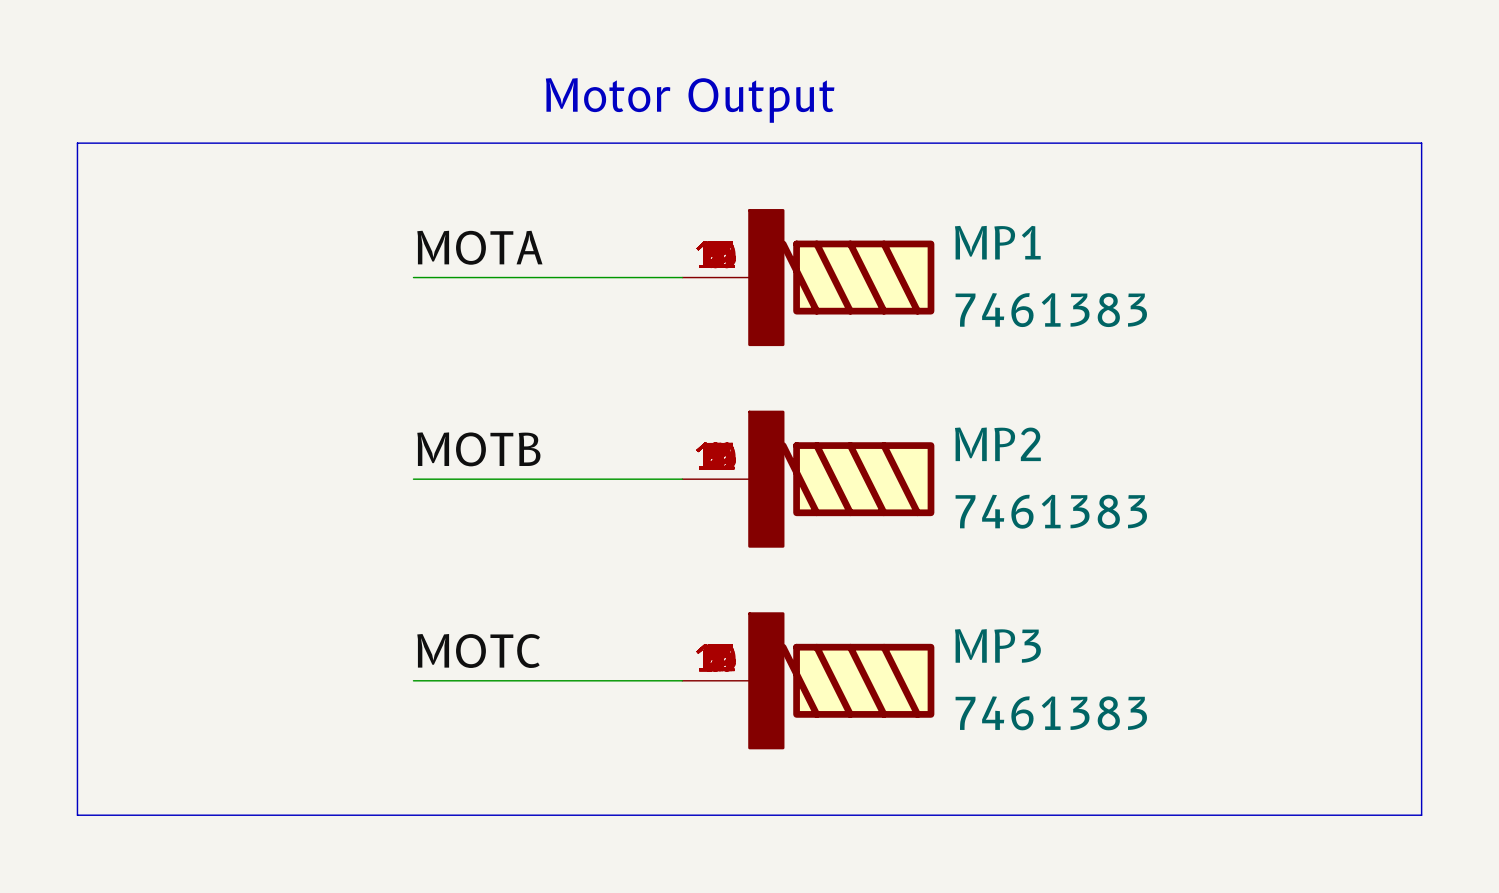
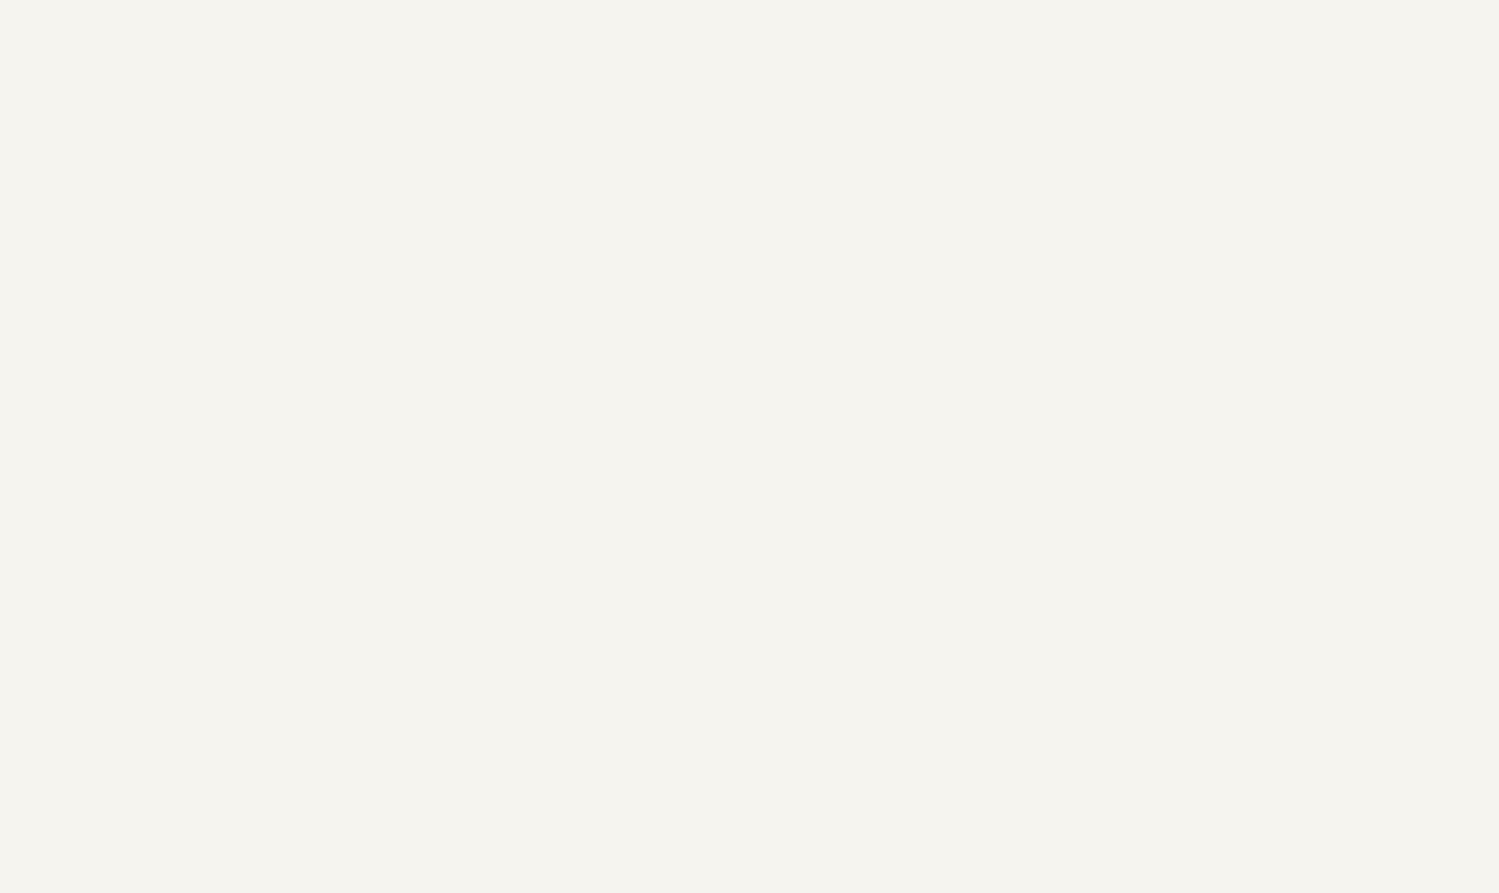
text: Motor Output (690, 100) -> none
line: (77, 143) (1421, 143) (1421, 815) (77, 815) (77, 143) -> none
label: MOTA (479, 247) -> none
wire: (413, 277) (682, 277) -> none
MP1: 7461383 (808, 277) -> none
label: MOTB (478, 449) -> none
wire: (413, 479) (682, 479) -> none
MP2: 7461383 (808, 479) -> none
label: MOTC (478, 651) -> none
wire: (413, 680) (682, 680) -> none
MP3: 7461383 (808, 680) -> none

